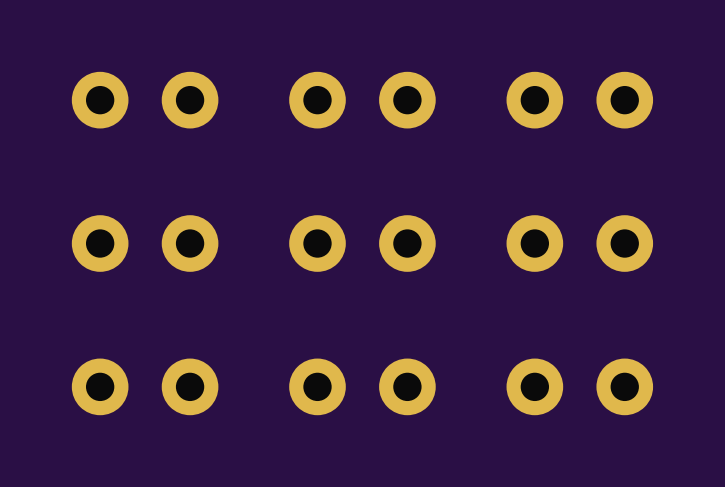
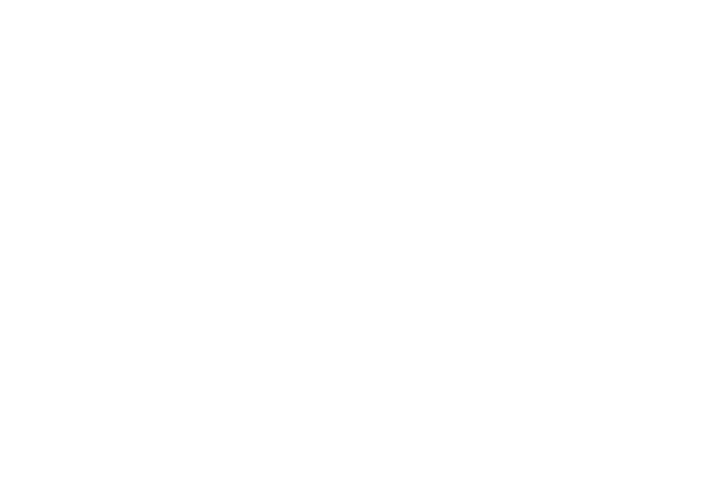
part: (145, 100) -> none
part: (362, 100) -> none
part: (579, 100) -> none
part: (145, 243) -> none
part: (362, 243) -> none
part: (579, 243) -> none
part: (145, 386) -> none
part: (362, 386) -> none
part: (579, 386) -> none

